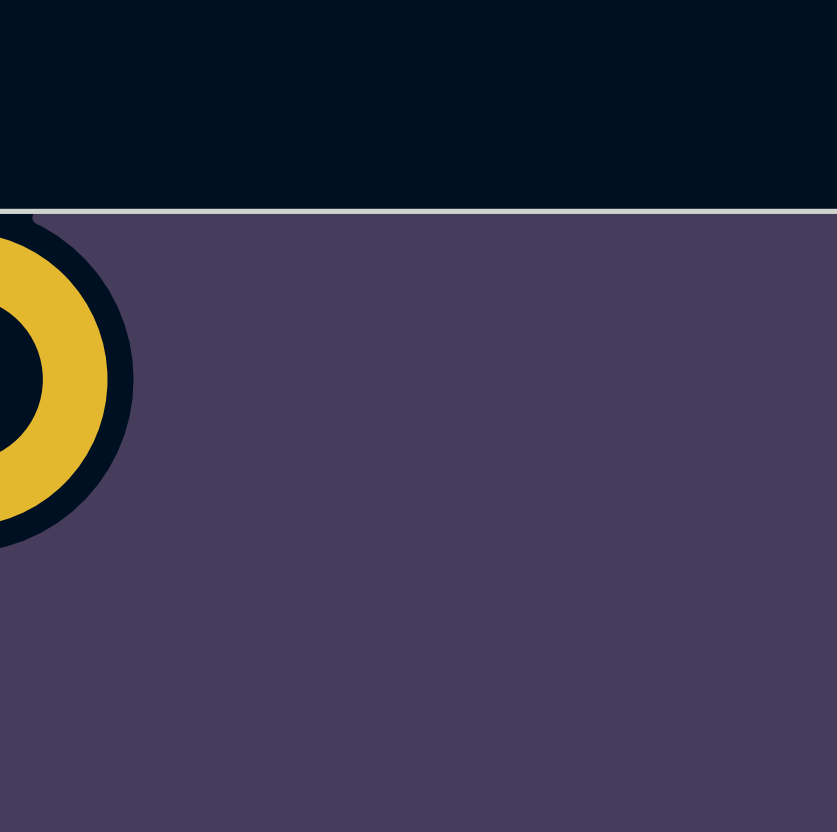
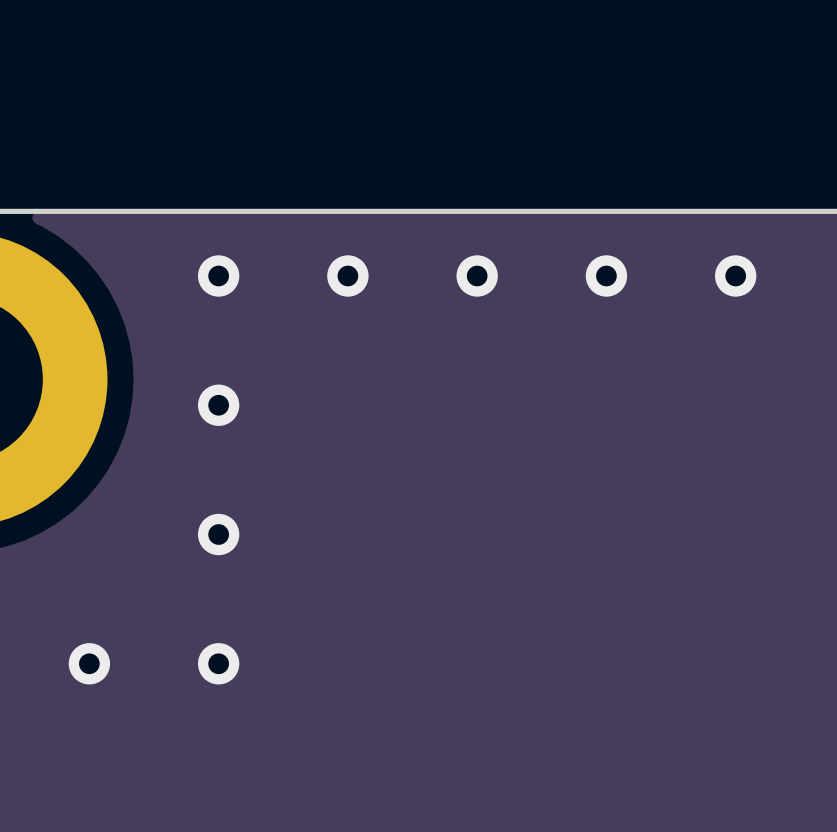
via: none -> (218, 275)
via: none -> (347, 275)
via: none -> (477, 275)
via: none -> (606, 275)
via: none -> (735, 275)
via: none -> (218, 405)
via: none -> (218, 534)
via: none -> (89, 663)
via: none -> (218, 663)

